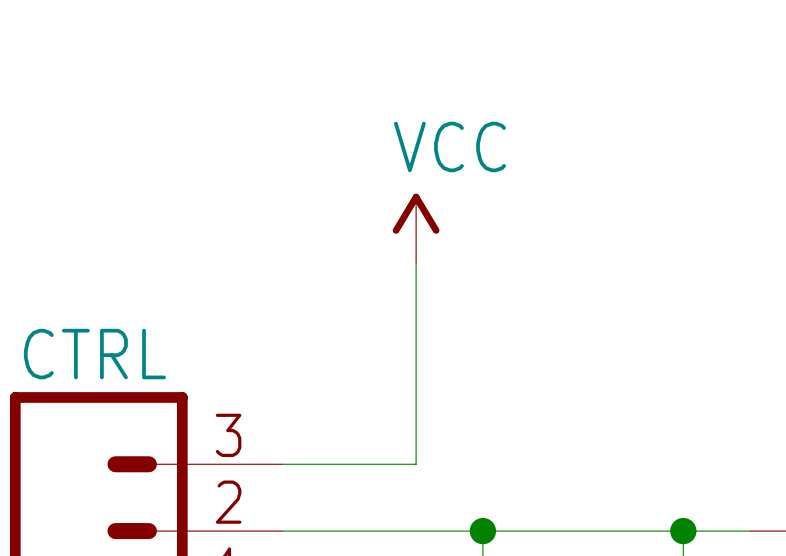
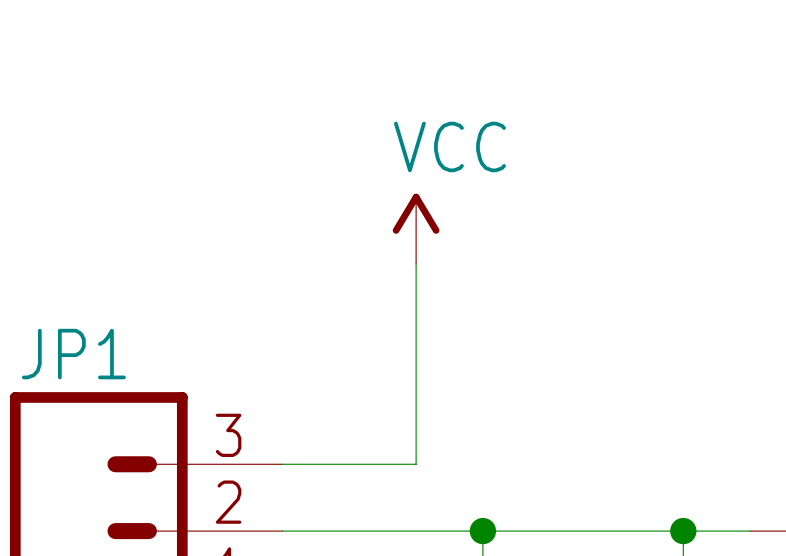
CTRL name: CTRL (94, 354) -> JP1 (73, 354)

